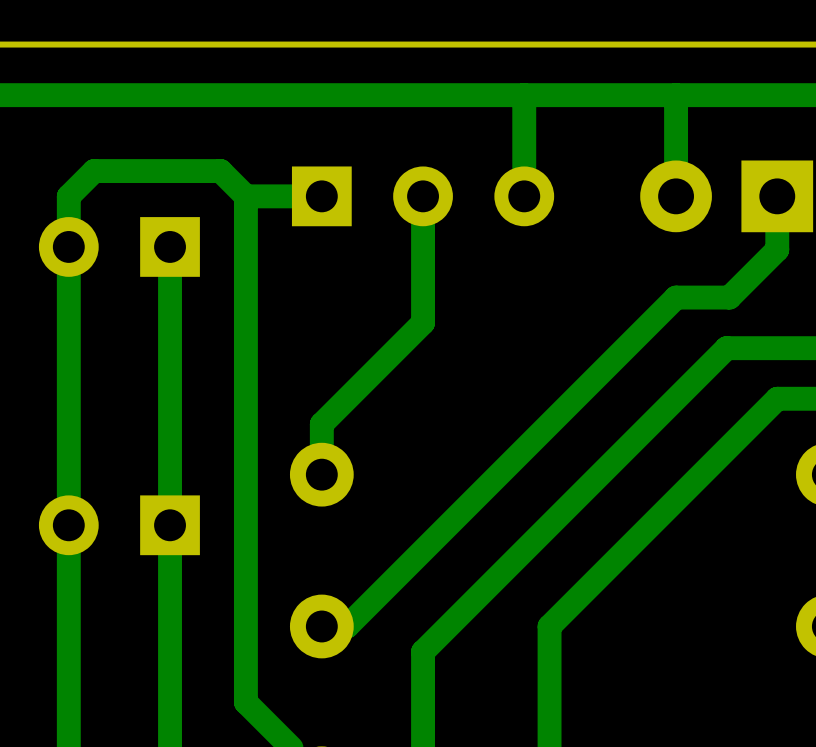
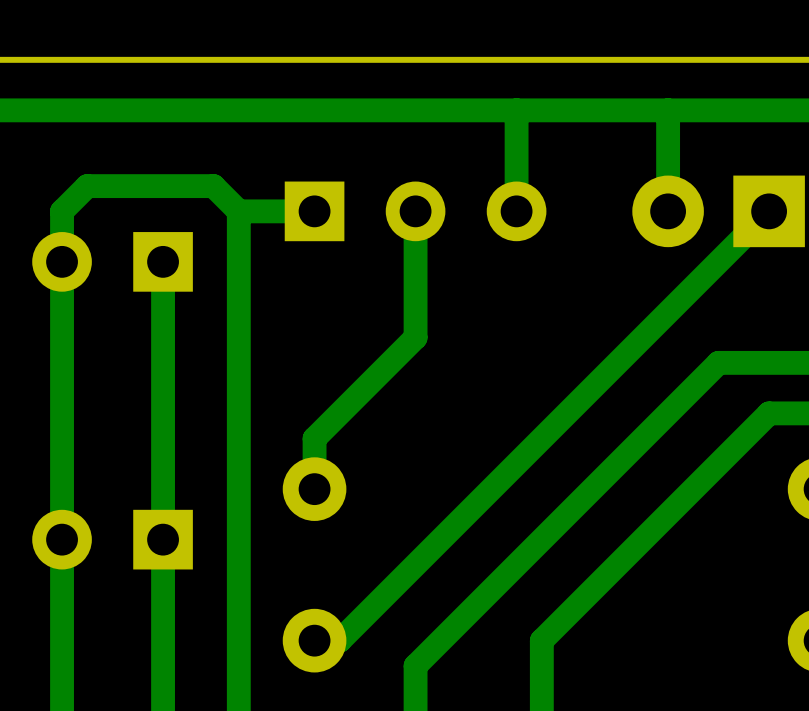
bottom track: (777, 196) (777, 249) (729, 297) (676, 297) -> (769, 211) (668, 312)

